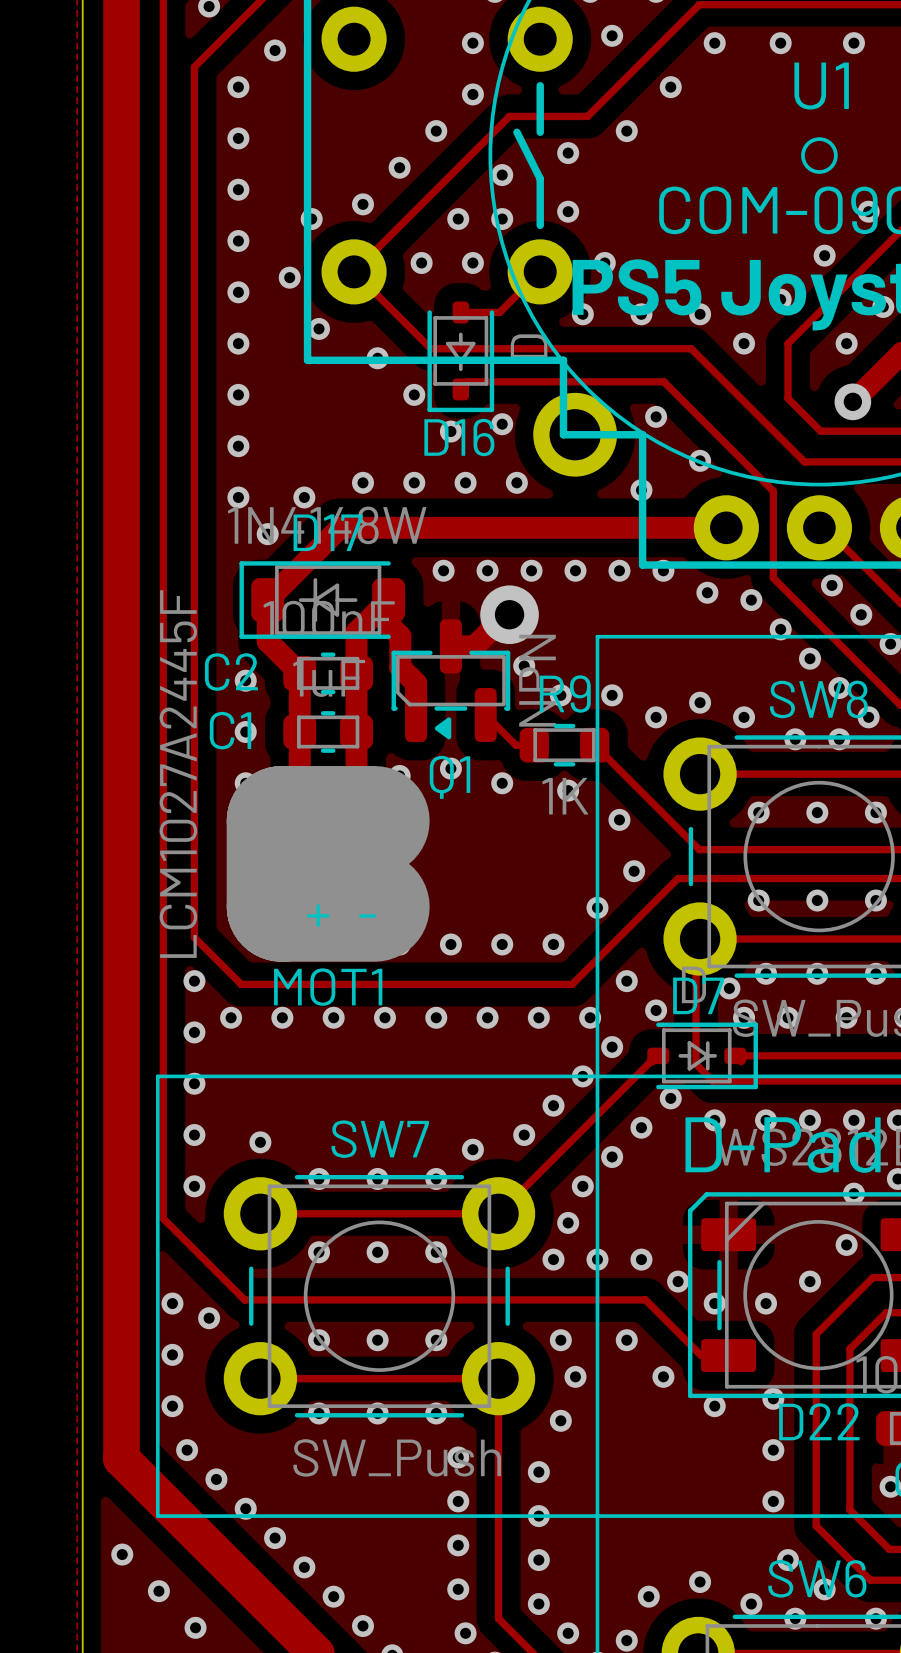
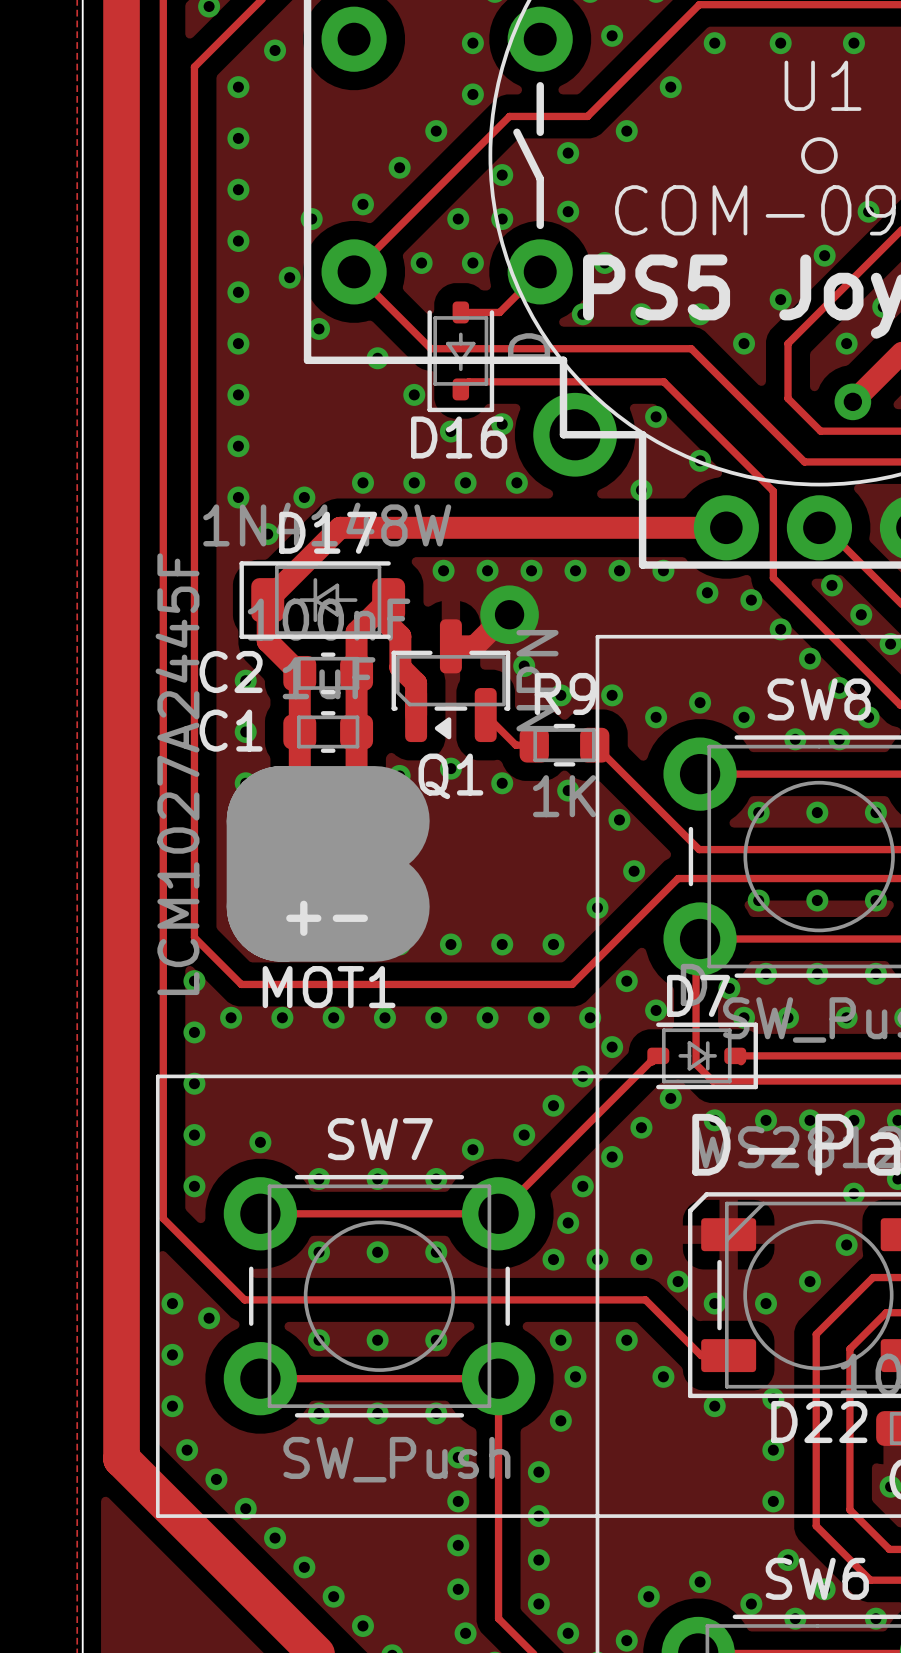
via: (122, 1554) -> none
via: (158, 1591) -> none
via: (195, 1627) -> none

